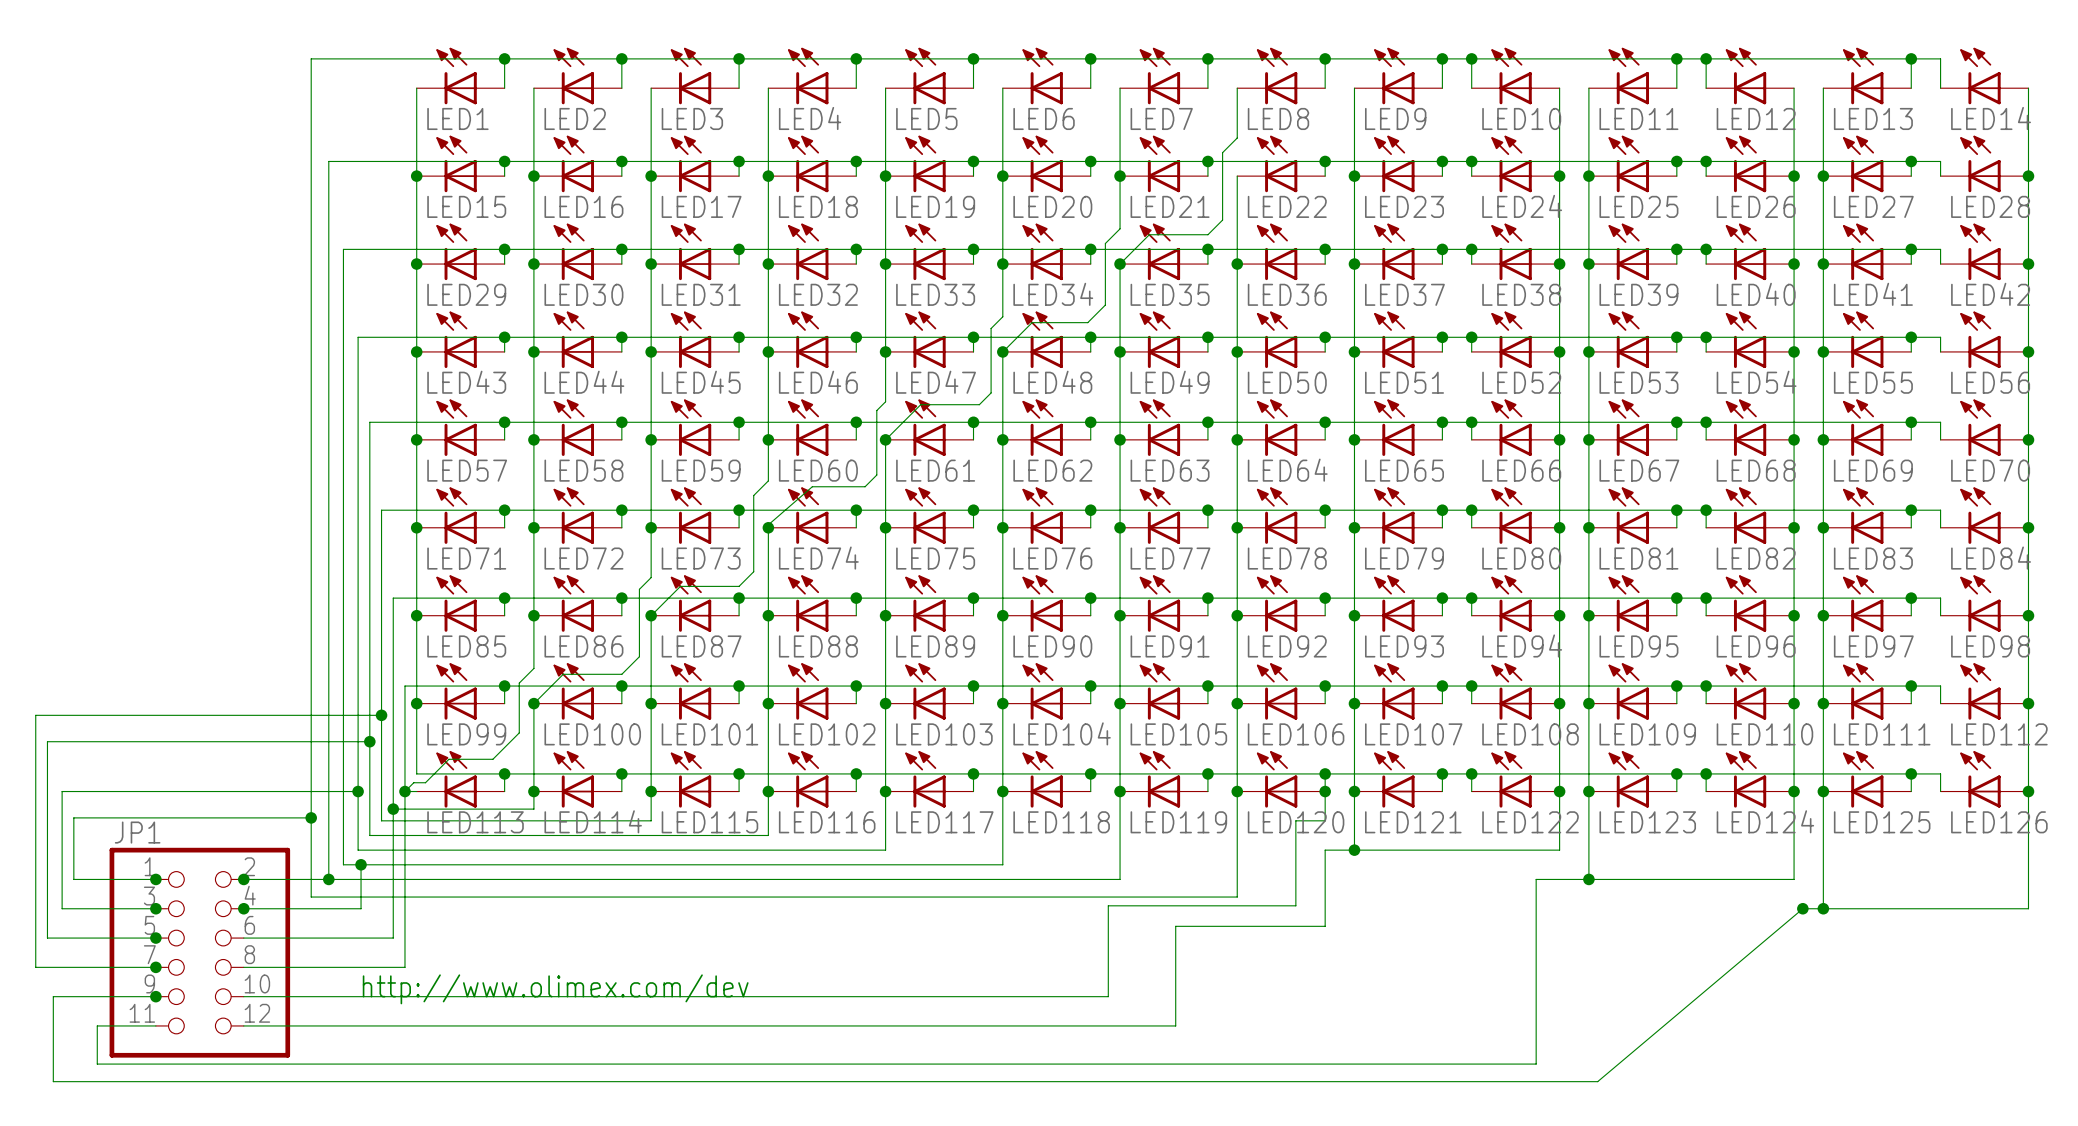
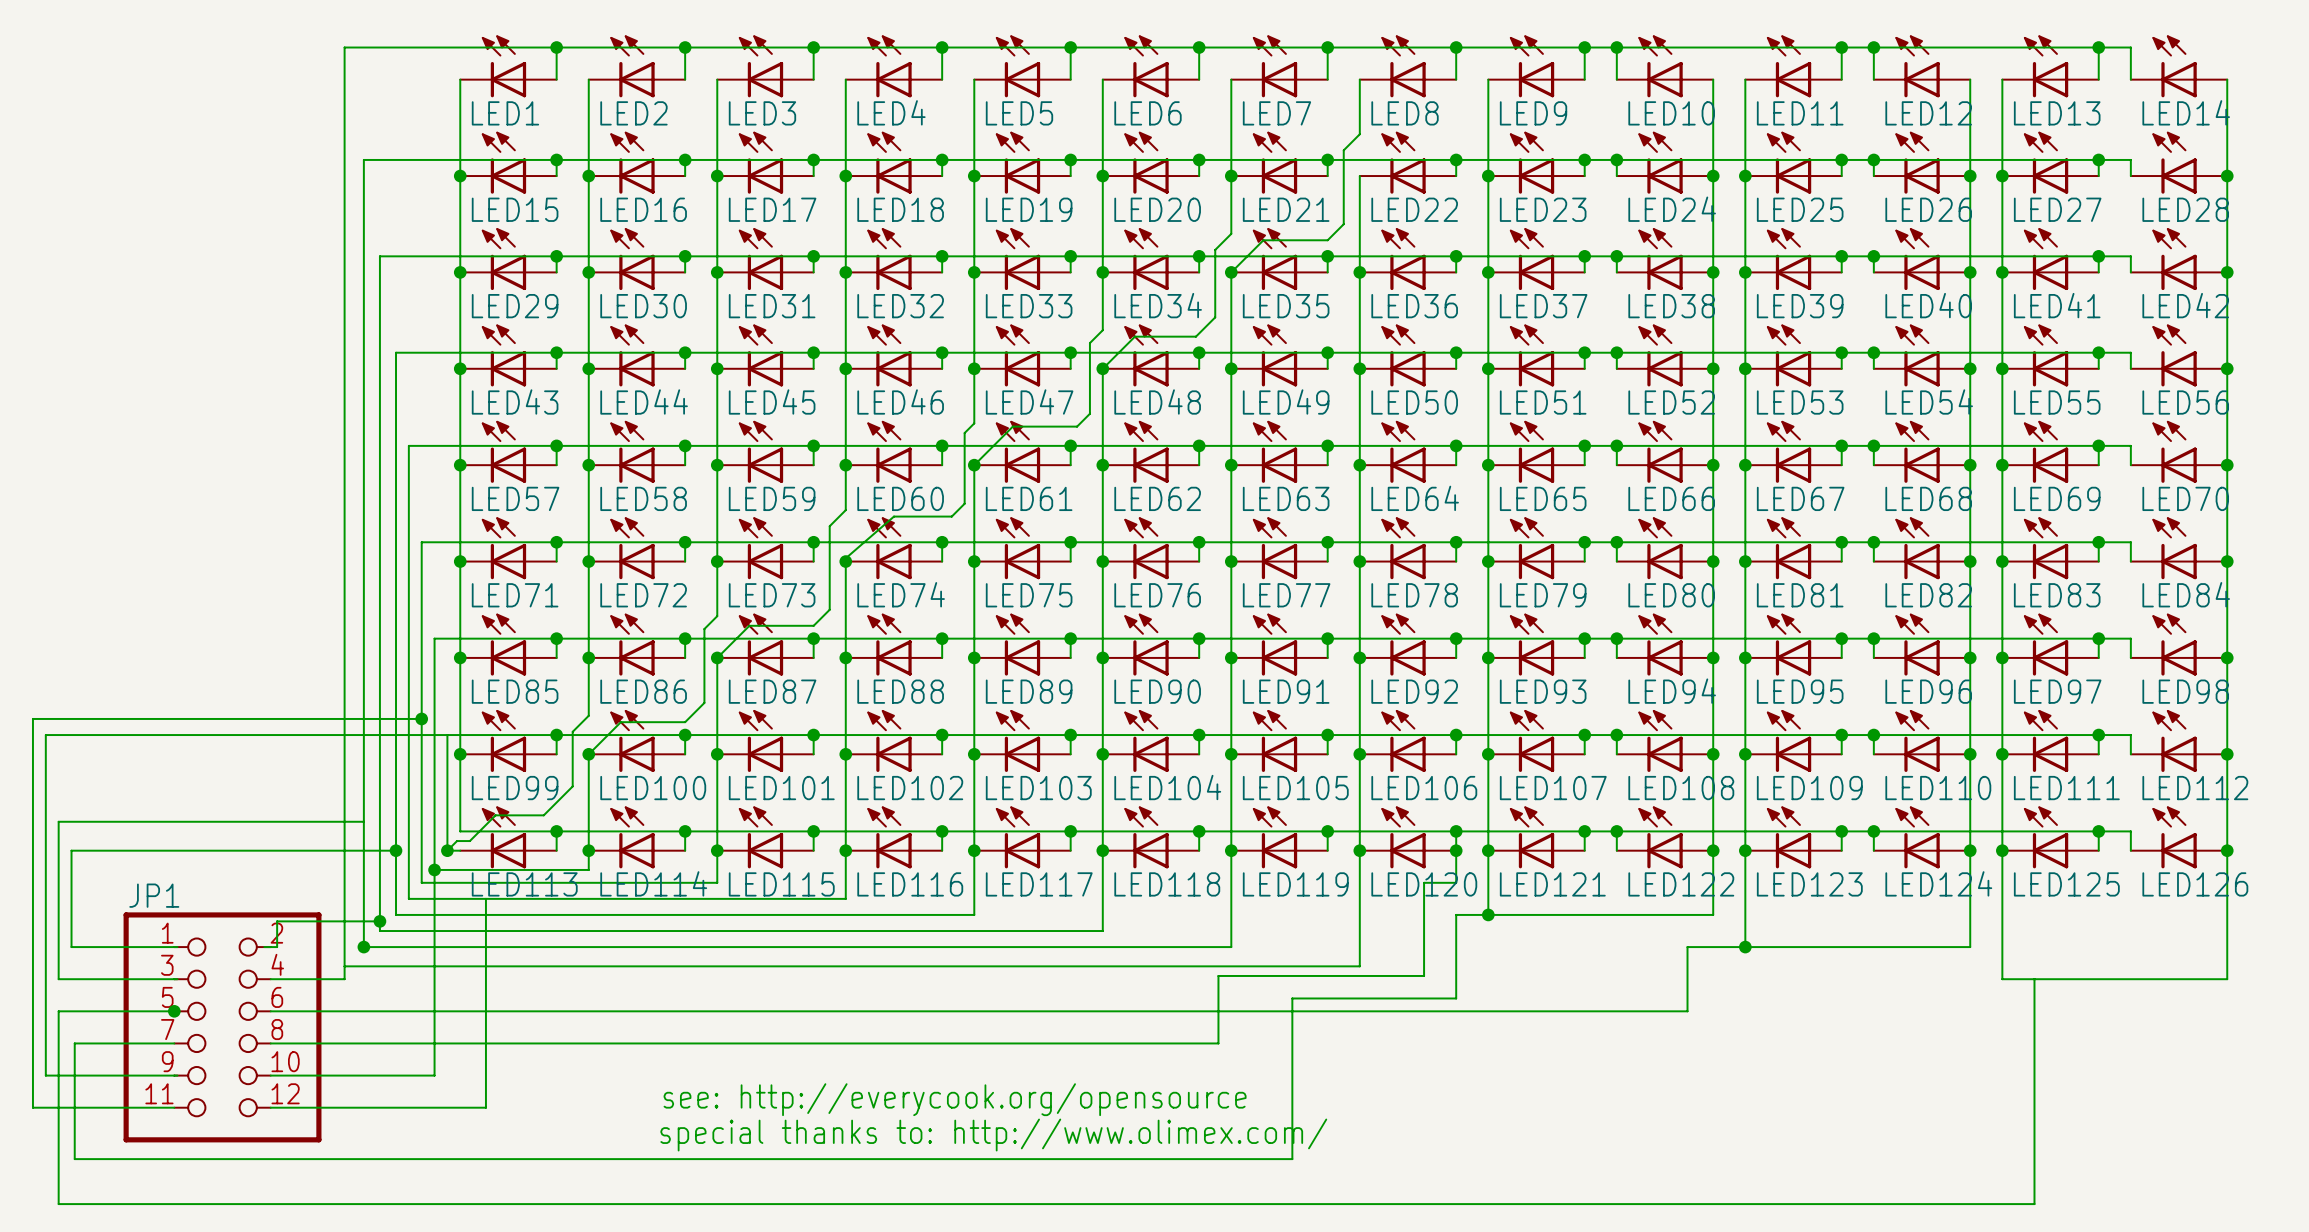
wire: none -> (421, 718) (32, 718) (32, 1107) (110, 1107)
junction: none -> (421, 718)
wire: (381, 715) (35, 715) (35, 967) (65, 967) -> none
junction: (381, 715) -> none
wire: (369, 741) (47, 741) (47, 938) (50, 938) -> (2034, 979) (2034, 1204) (58, 1204) (58, 1011)
junction: (369, 741) -> none
wire: none -> (363, 821) (58, 821) (58, 979) (71, 979)
wire: (404, 791) (404, 967) -> none
wire: (311, 817) (73, 817) (73, 879) -> none
junction: (311, 817) -> none
wire: none -> (485, 898) (485, 1107)
wire: (361, 864) (361, 908) (311, 908) -> (344, 966) (344, 979)
junction position: (361, 864) -> (379, 921)
wire: (62, 879) (62, 908) -> (71, 947) (84, 947)
junction: (155, 879) -> none
junction: (243, 879) -> none
wire: (249, 879) (328, 879) -> (277, 947) (277, 921) (379, 921)
junction: (155, 908) -> none
junction: (243, 908) -> none
junction: (1802, 908) -> none
wire: (1823, 908) (1802, 908) (1597, 1081) (53, 1081) (53, 996) -> (447, 735) (45, 735) (45, 1075) (61, 1075)
junction: (1823, 908) -> none
wire: (1536, 938) (1536, 1064) (97, 1064) (97, 1025) -> (1687, 1011) (434, 1011) (434, 1075)
junction: (155, 967) -> none
wire: (1108, 967) (1108, 996) (393, 996) -> (1218, 1043) (447, 1043)
text: http://www.olimex.com/dev (555, 989) -> none
junction: (155, 996) -> none
text: none -> see: http://everycook.org/opensource (955, 1099)
wire: (440, 1025) (1175, 1025) -> (74, 1043) (74, 1159) (1292, 1159) (1292, 1107)
text: none -> special thanks to: http://www.olimex.com/ (993, 1135)

